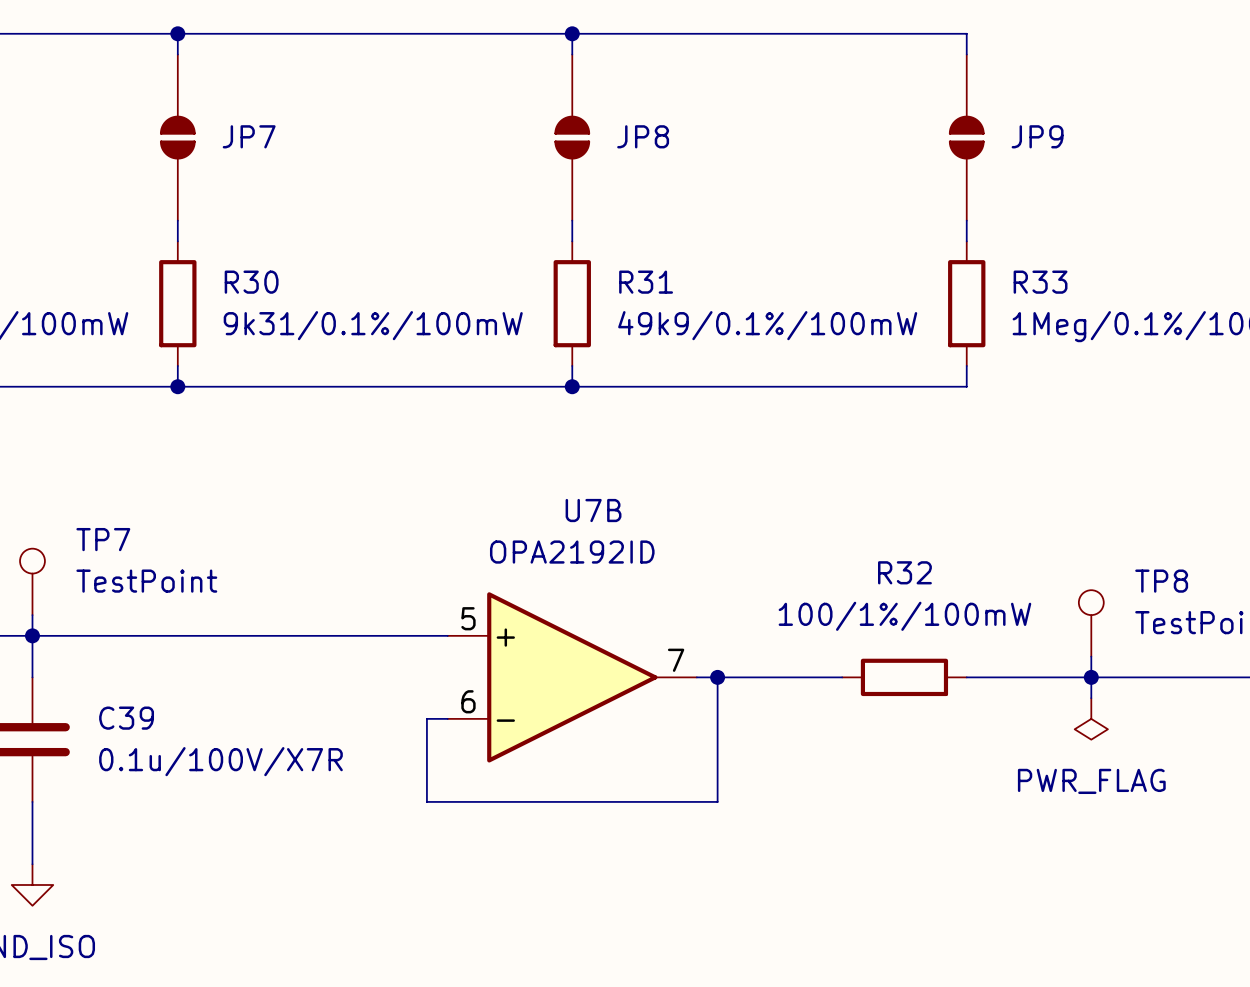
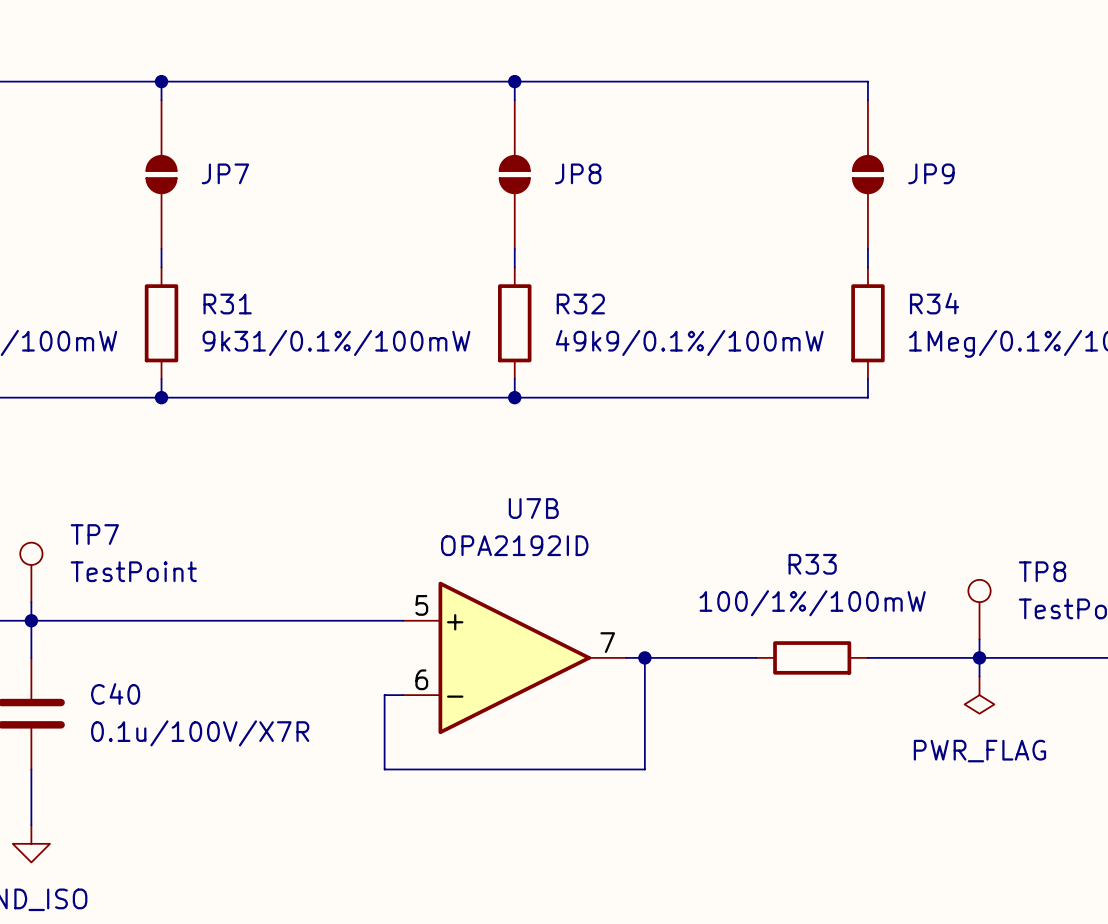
R30 name: R30 (251, 282) -> R31 (227, 304)
R31 name: R31 (646, 282) -> R32 (580, 304)
R33 name: R33 (1040, 282) -> R34 (934, 303)
R32 name: R32 (904, 572) -> R33 (812, 564)
C39 name: C39 (126, 718) -> C40 (115, 693)

